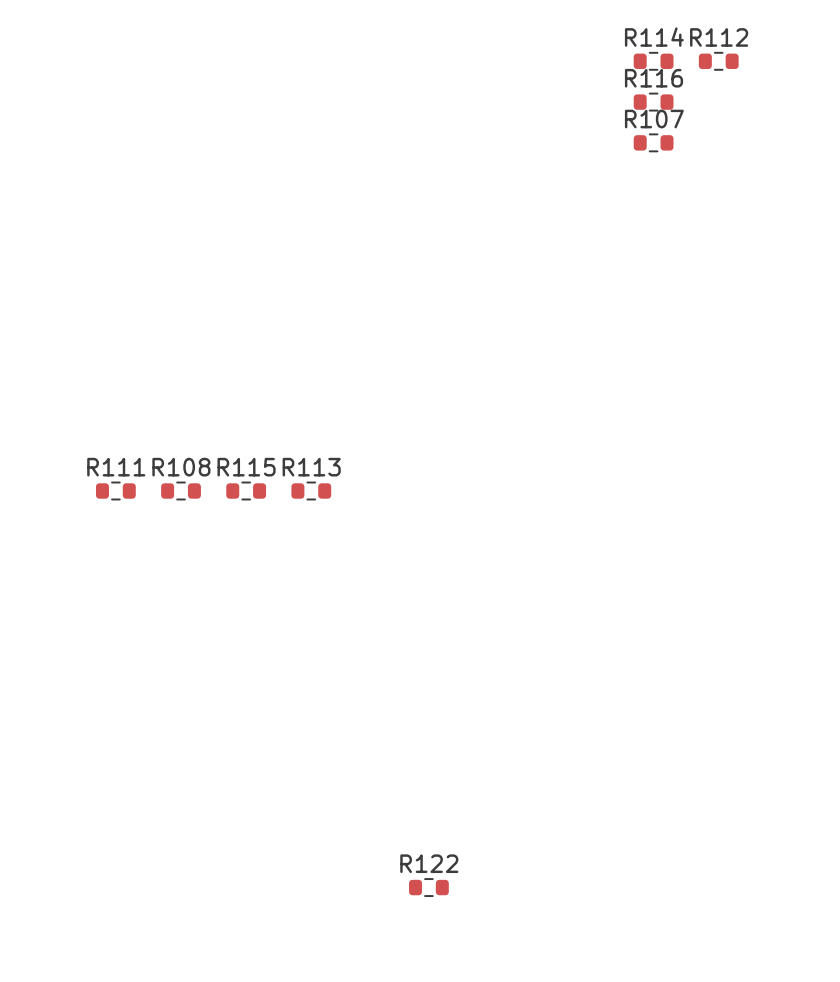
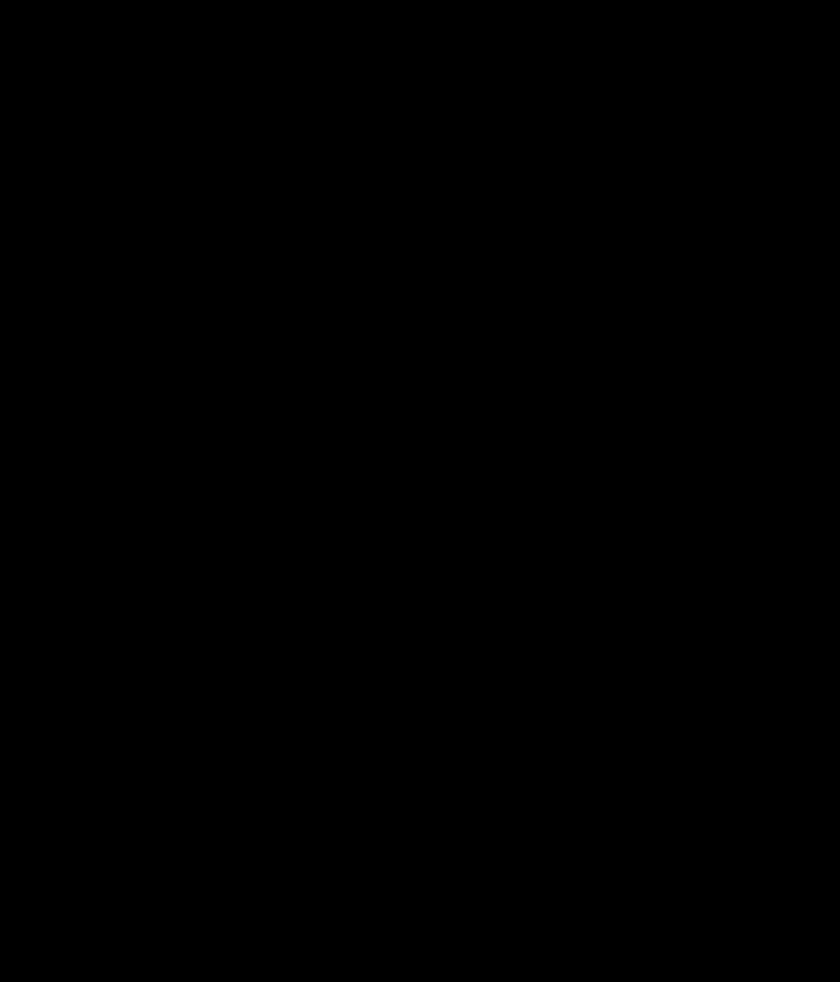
R114: (653, 61) -> none
R112: (718, 61) -> none
R116: (653, 102) -> none
R107: (653, 142) -> none
R111: (115, 490) -> none
R108: (181, 490) -> none
R115: (246, 490) -> none
R113: (311, 490) -> none
R122: (428, 887) -> none

